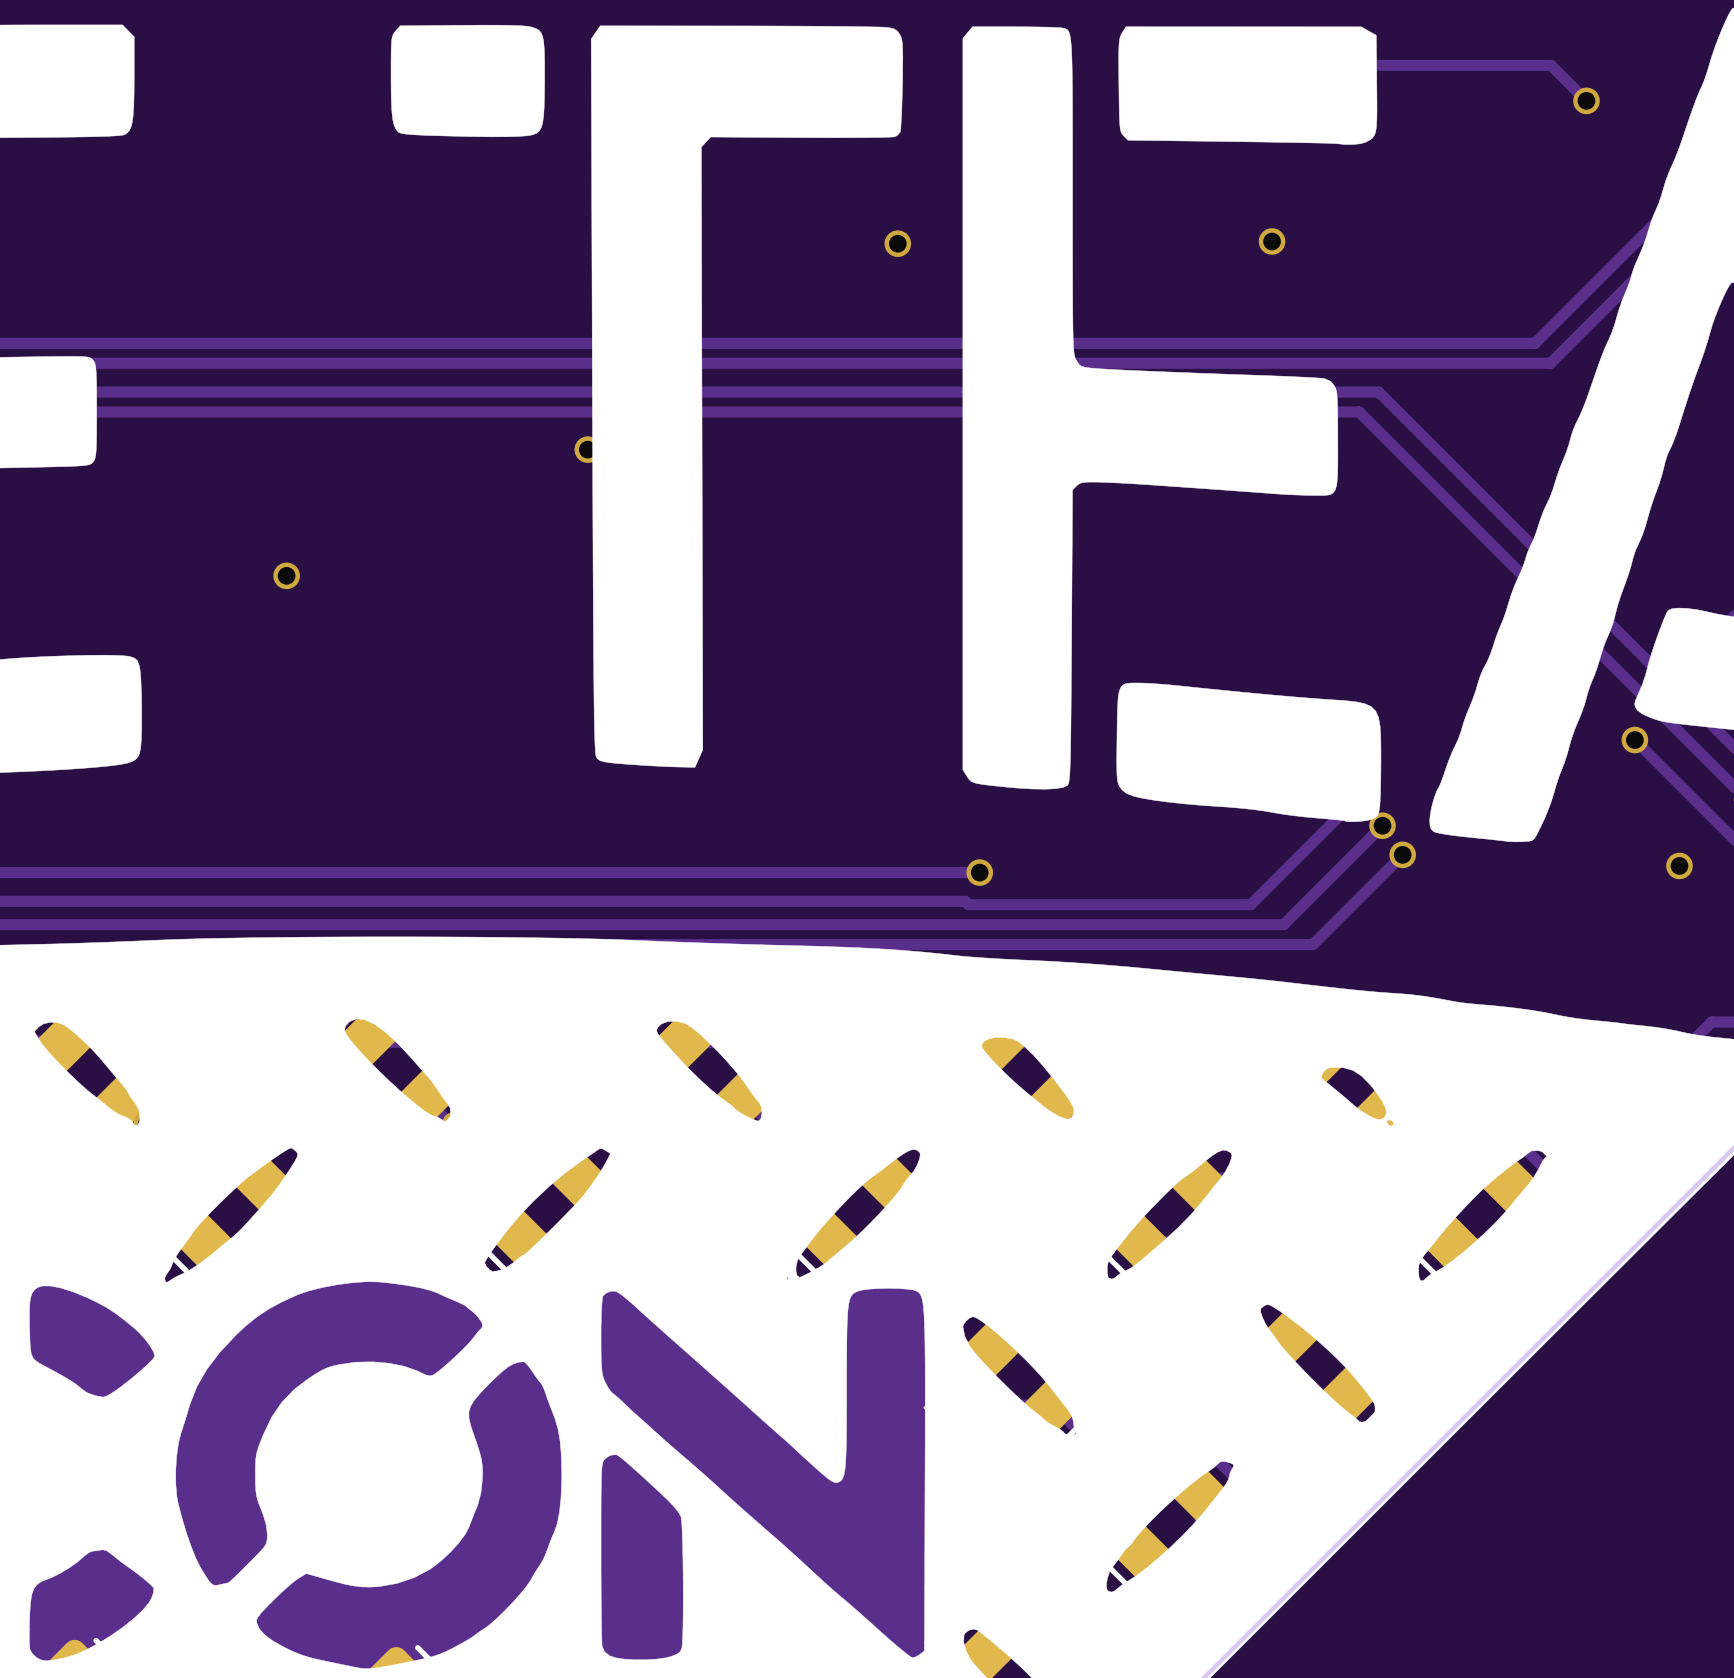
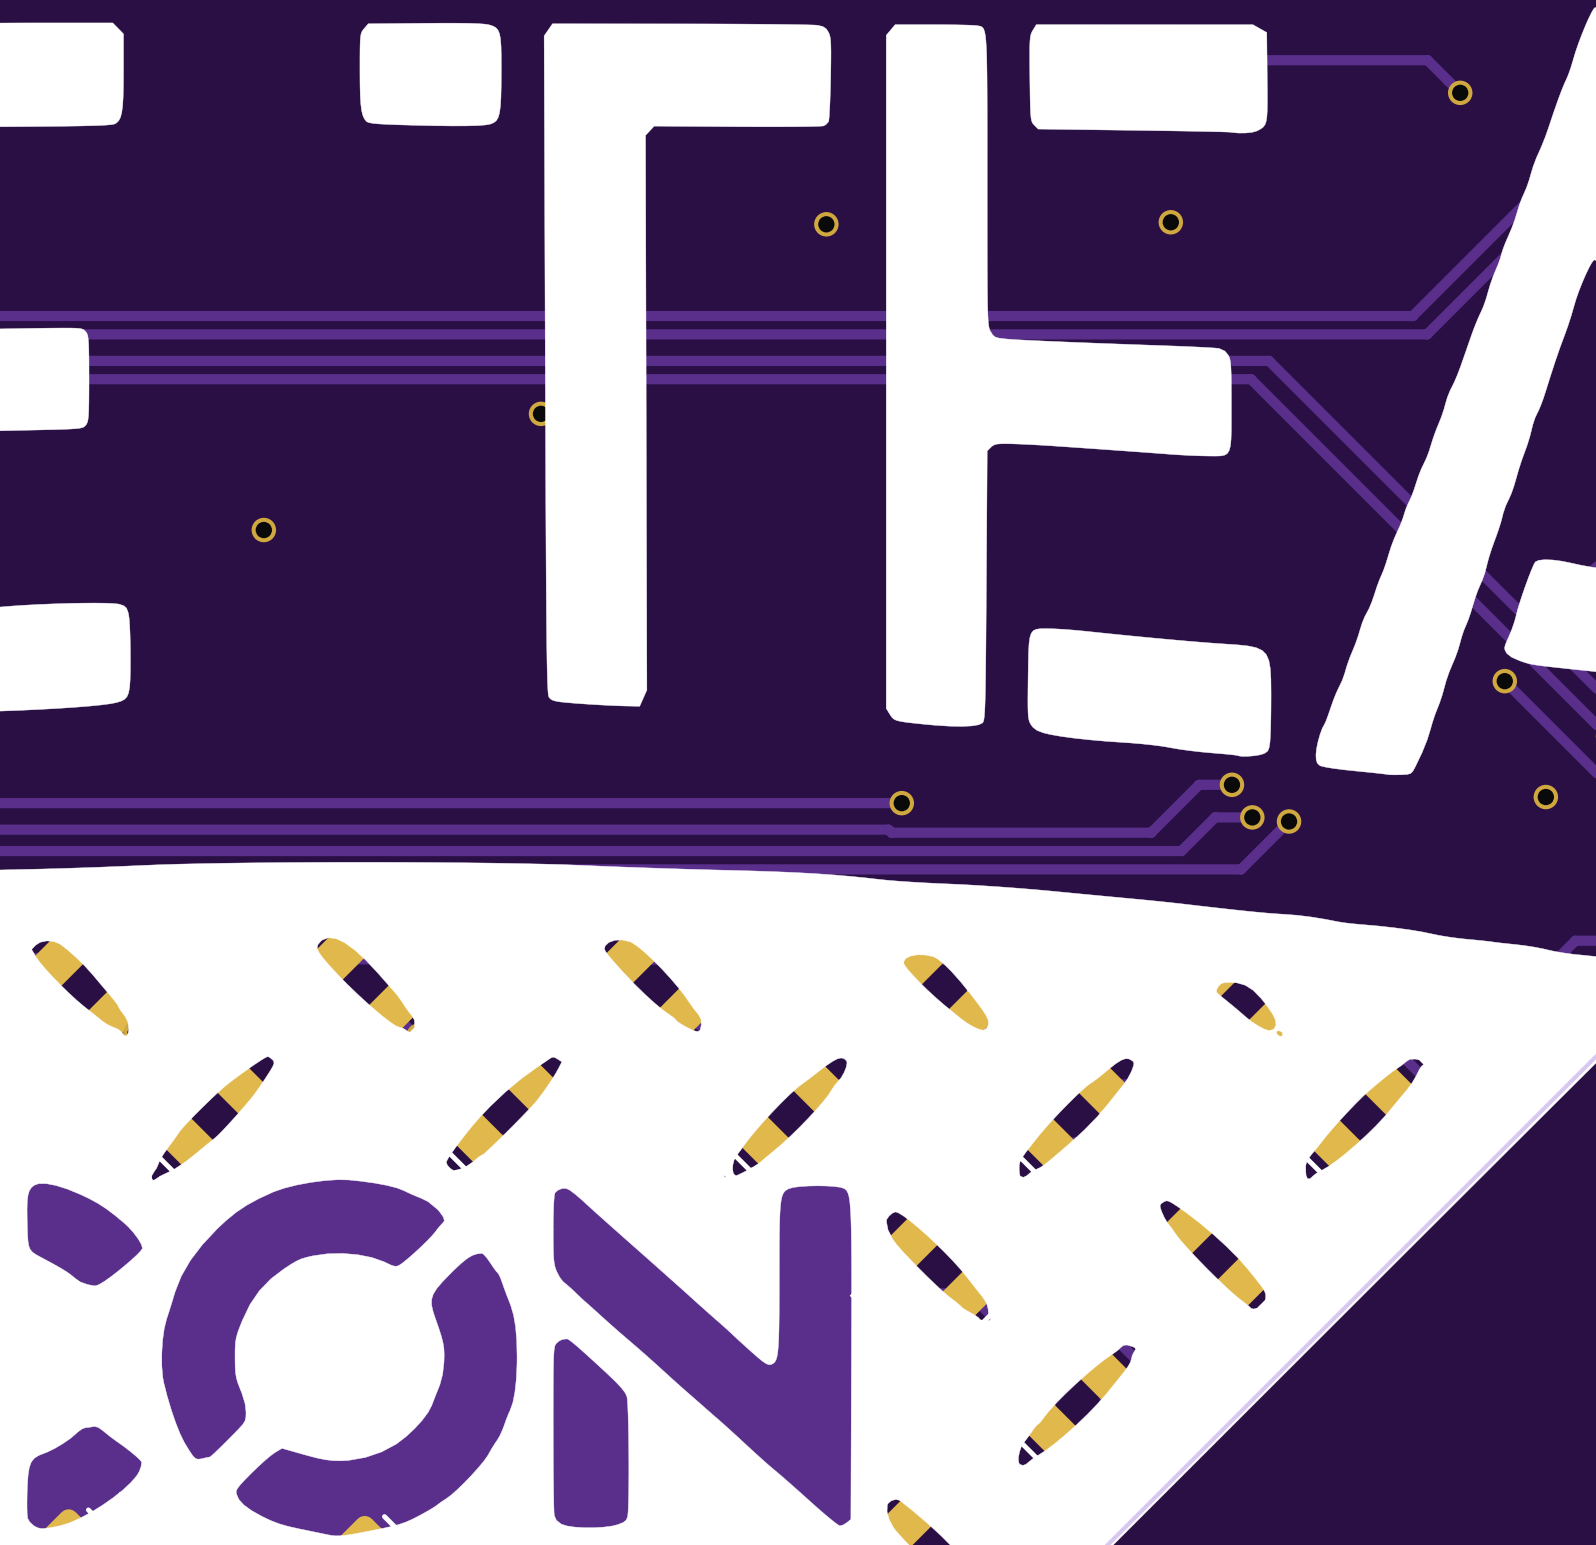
track: (1357, 798) (1302, 852) -> (1231, 784) (1199, 784)
track: (1382, 825) (1320, 888) -> (1252, 817) (1215, 817)
via: (1382, 825) -> none
via: none -> (1231, 784)
track: (1402, 854) (1313, 944) -> (1289, 821) (1241, 869) (1208, 869)
via: (1402, 854) -> none
via: none -> (1252, 817)
via: none -> (1289, 821)

